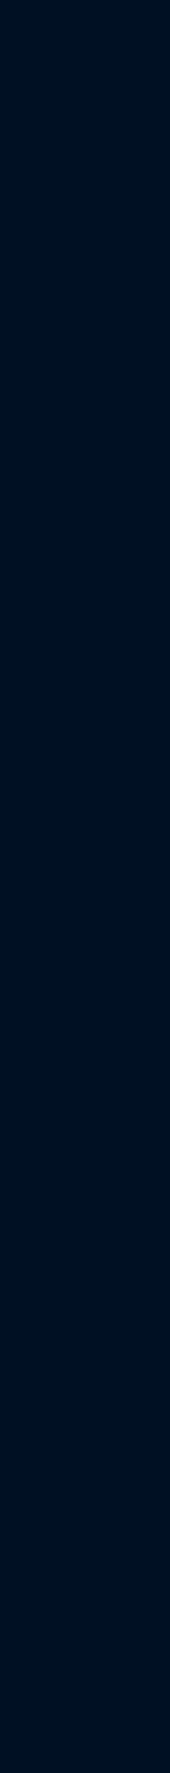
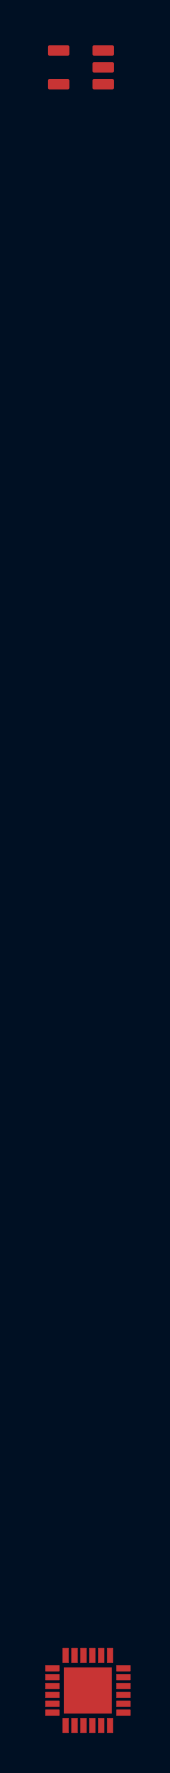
part: none -> (80, 67)
part: none -> (87, 1690)

